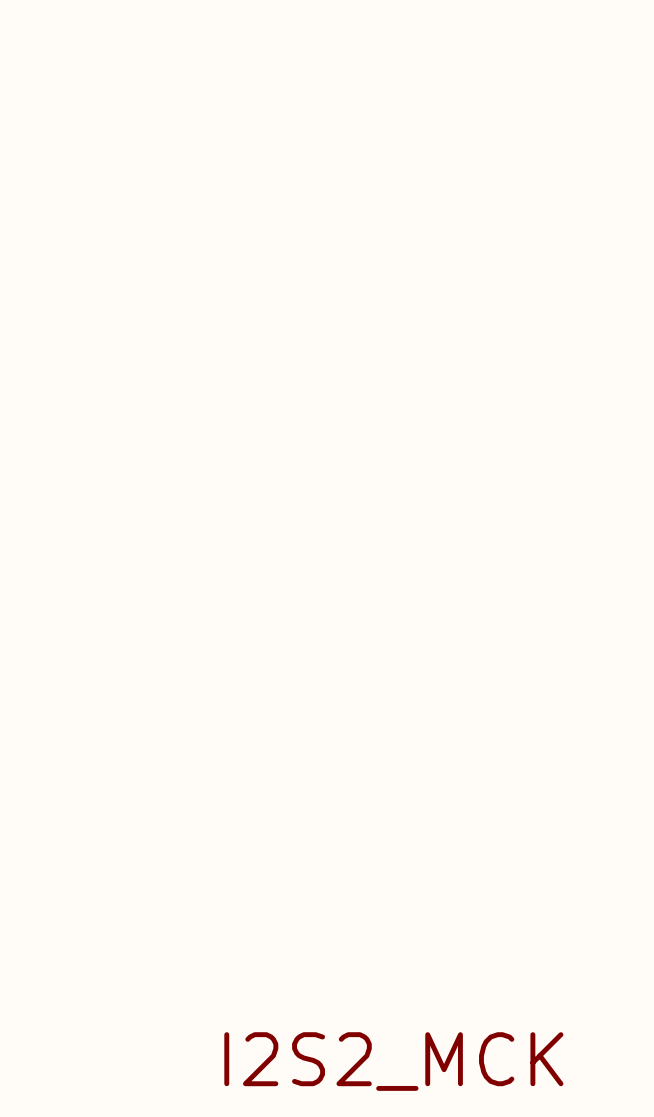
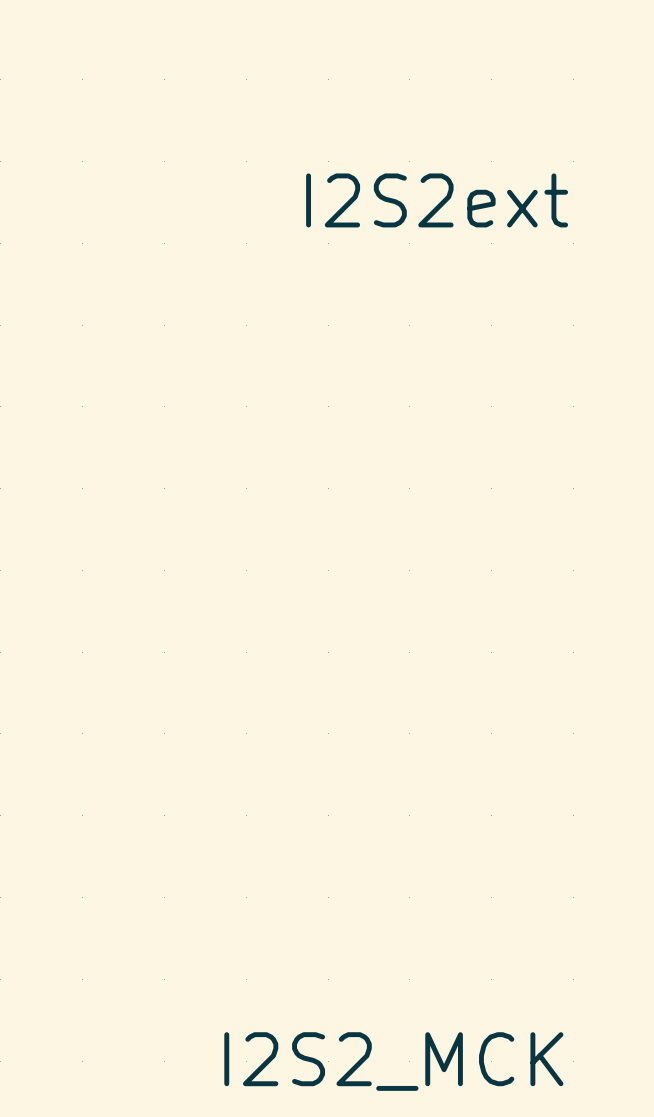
label: none -> I2S2ext (437, 200)

